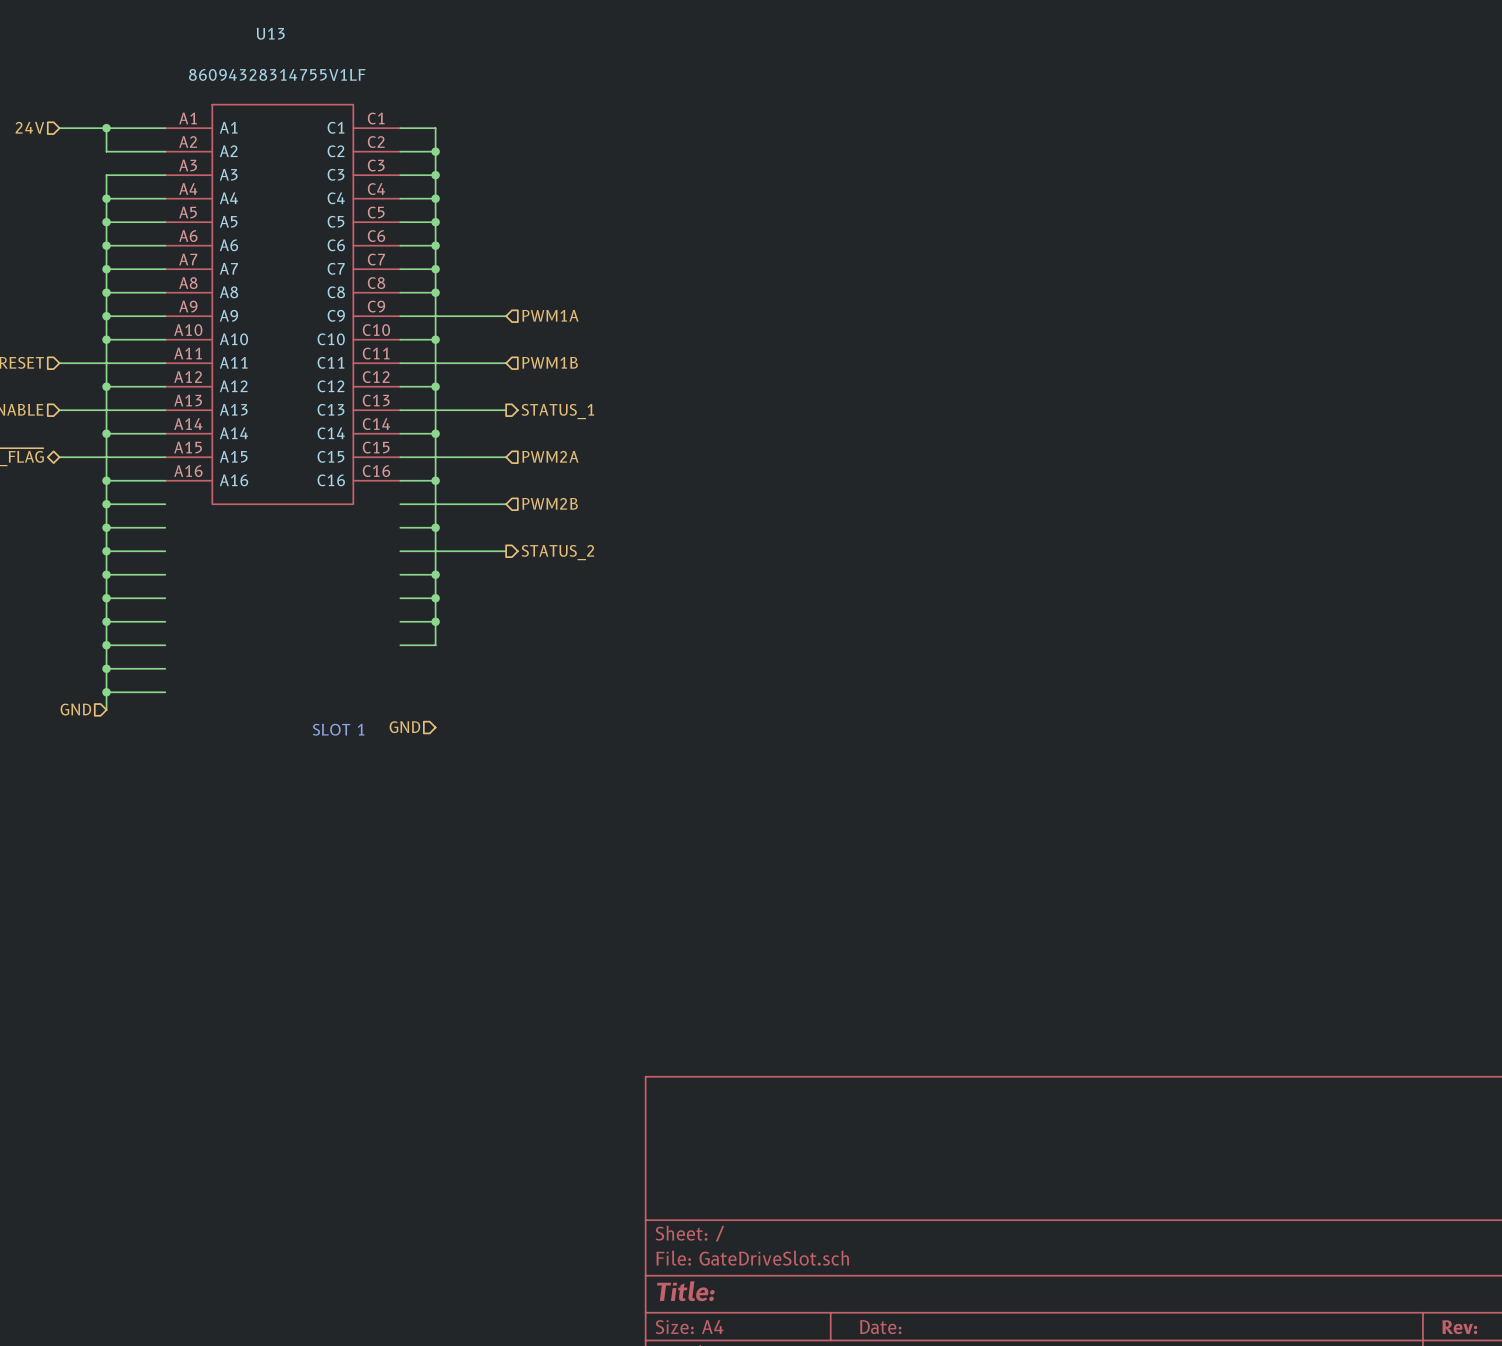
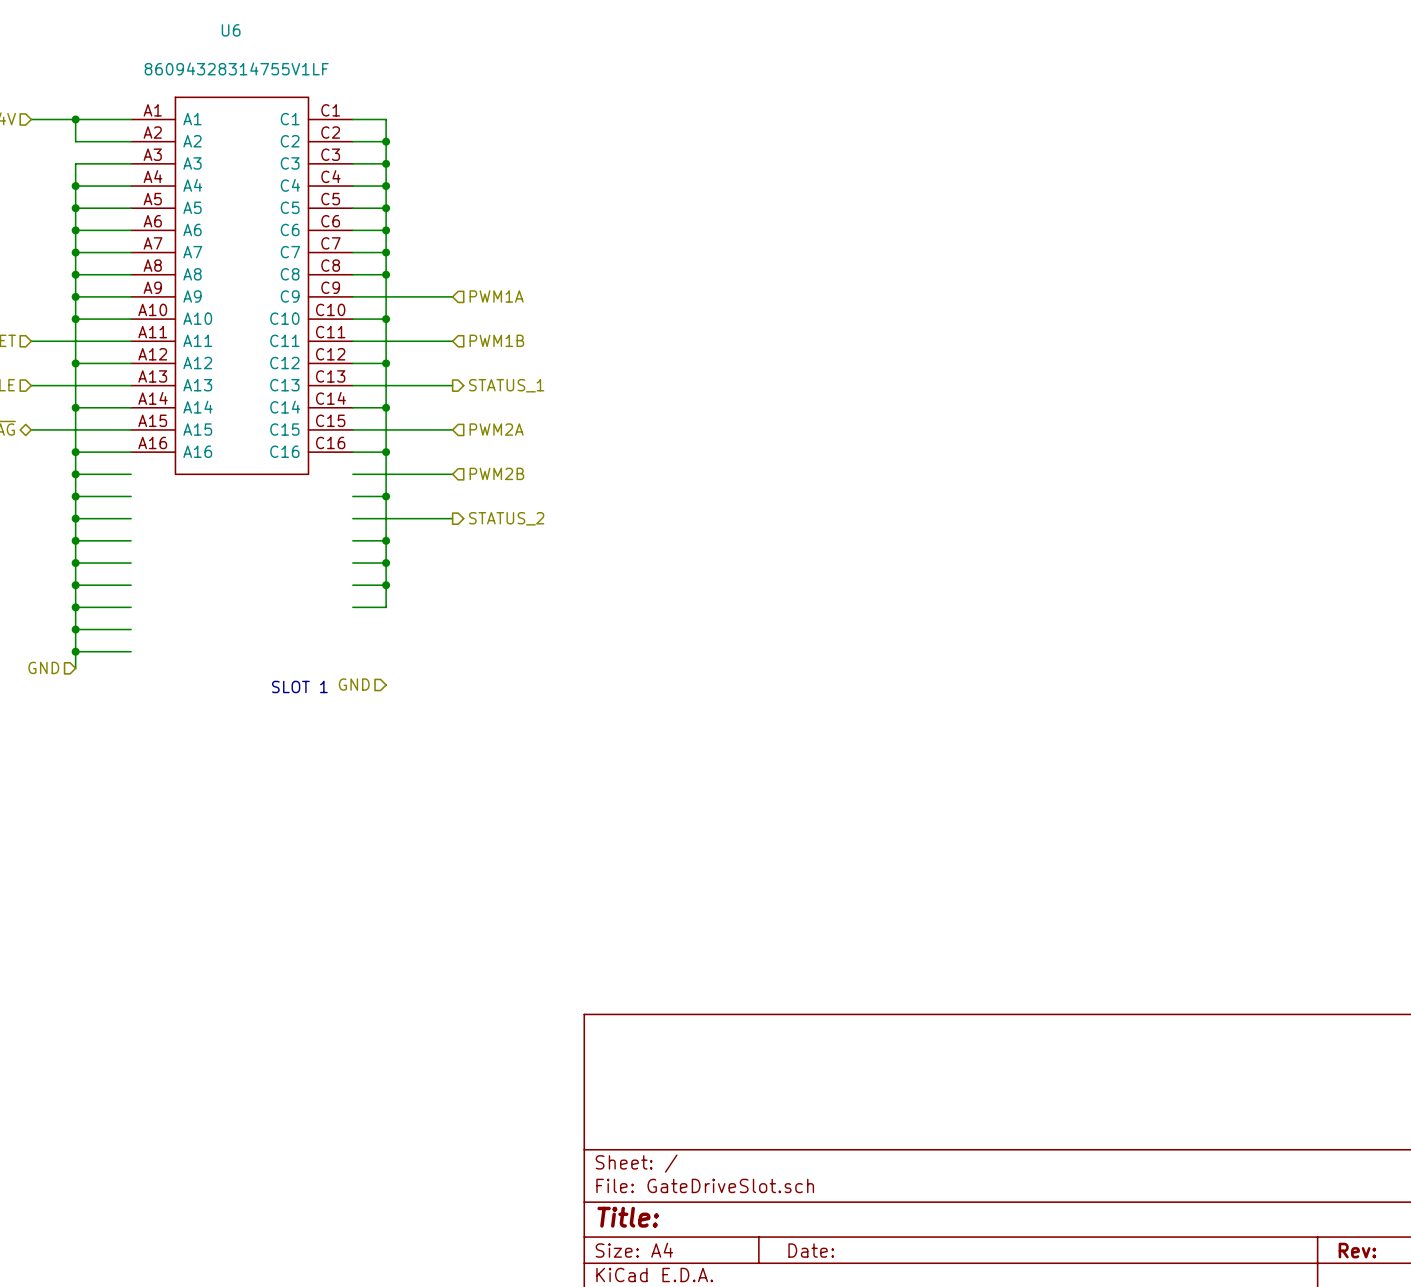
U13 name: U13 (270, 33) -> U6 (231, 30)

